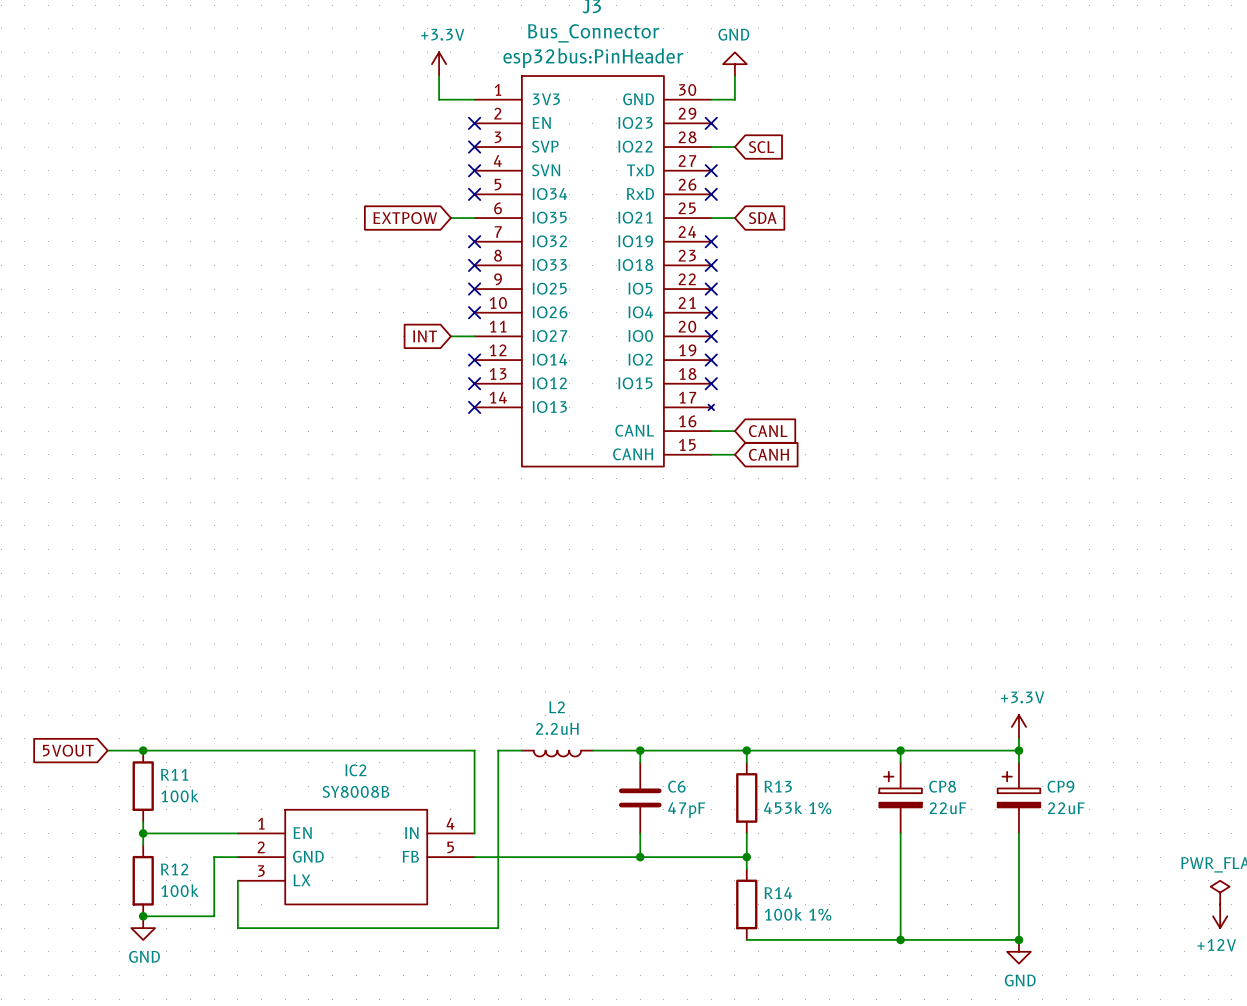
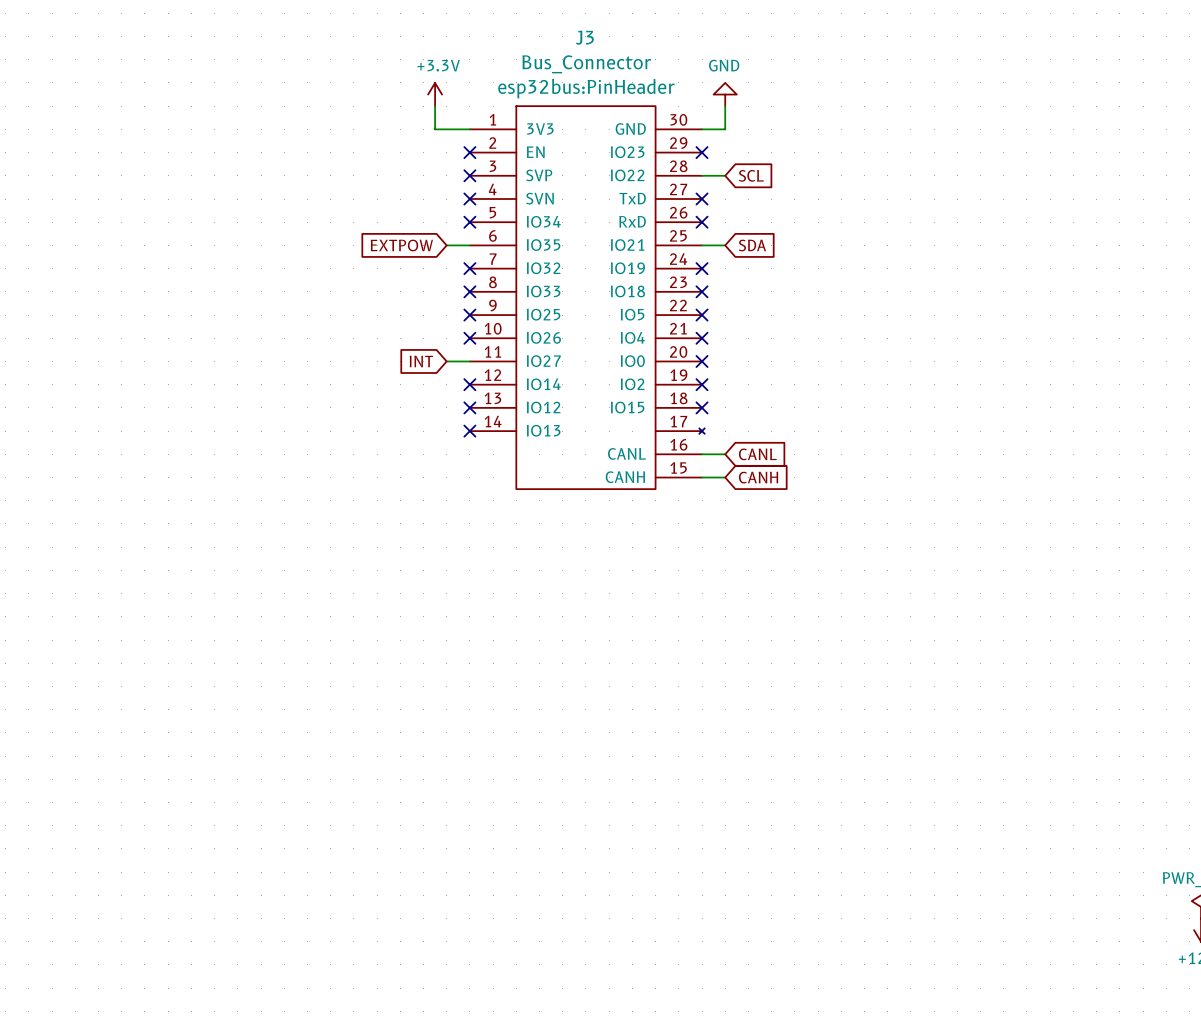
power symbol: +3.3V (1018, 726) -> none
wire: (1018, 738) (1018, 762) -> none
global label: 5VOUT (68, 750) -> none
wire: (107, 750) (474, 750) (474, 833) -> none
junction: (143, 750) -> none
wire: (521, 750) (498, 750) (498, 928) (237, 928) (237, 880) -> none
wire: (592, 750) (1018, 750) -> none
wire: (640, 750) (640, 762) -> none
junction: (640, 750) -> none
wire: (746, 750) (746, 762) -> none
junction: (746, 750) -> none
wire: (900, 750) (900, 762) -> none
junction: (900, 750) -> none
junction: (1018, 750) -> none
L2: 2.2uH (557, 753) -> none
R11: 100k (143, 786) -> none
C6: 47pF (640, 797) -> none
R13: 453k 1% (746, 797) -> none
CP8: 22uF (900, 797) -> none
CP9: 22uF (1018, 797) -> none
wire: (143, 821) (143, 845) -> none
wire: (143, 833) (237, 833) -> none
junction: (143, 833) -> none
wire: (640, 833) (640, 857) -> none
wire: (746, 833) (746, 868) -> none
wire: (900, 833) (900, 939) -> none
wire: (1018, 833) (1018, 939) (746, 939) -> none
wire: (237, 857) (214, 857) (214, 916) (143, 916) -> none
IC2: SY8008B (356, 857) -> none
wire: (474, 857) (746, 857) -> none
junction: (640, 857) -> none
junction: (746, 857) -> none
R12: 100k (143, 880) -> none
R14: 100k 1% (746, 904) -> none
junction: (143, 916) -> none
power symbol: GND (143, 928) -> none
junction: (900, 939) -> none
junction: (1018, 939) -> none
power symbol: GND (1018, 951) -> none

